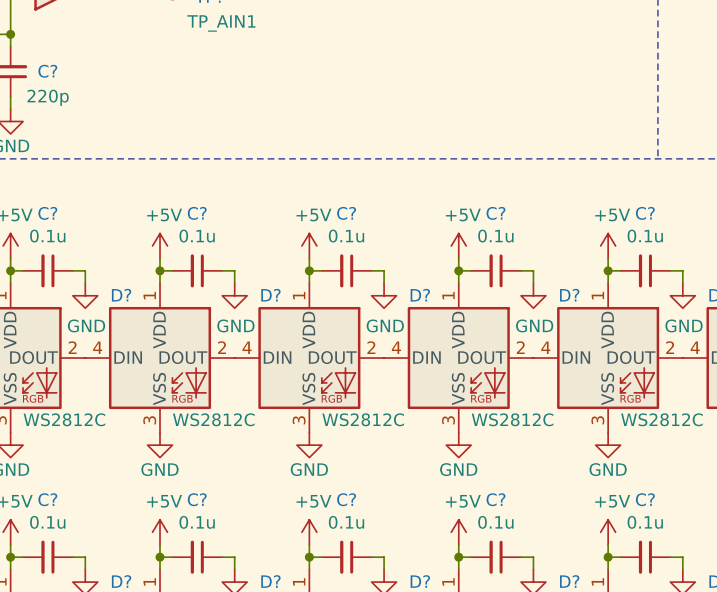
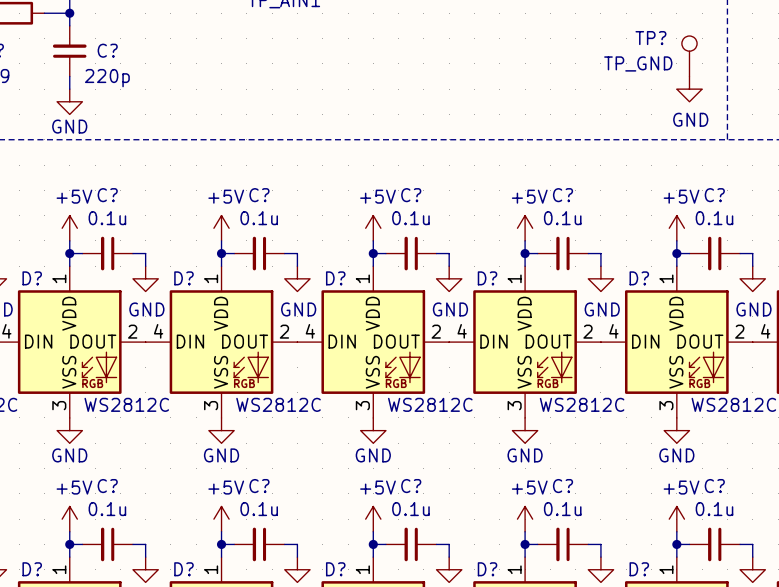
TP?: none -> TP_GND (689, 56)
power symbol: none -> GND (689, 89)

